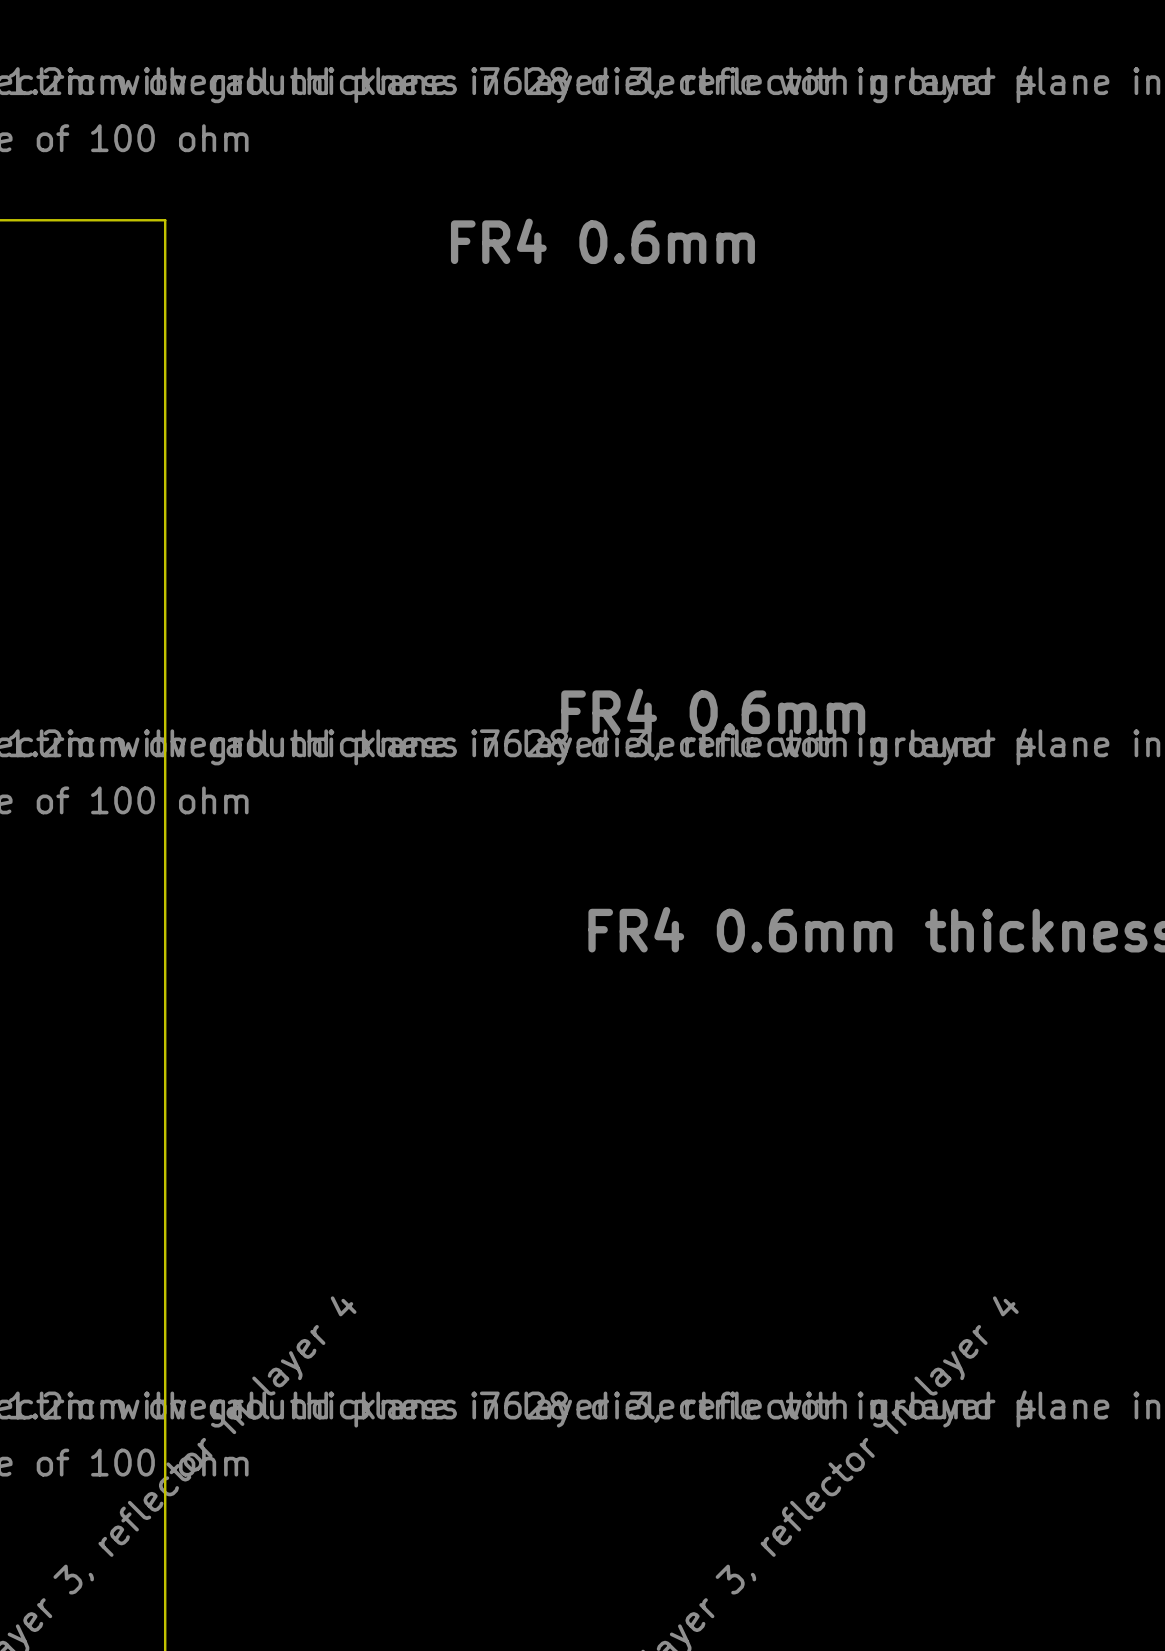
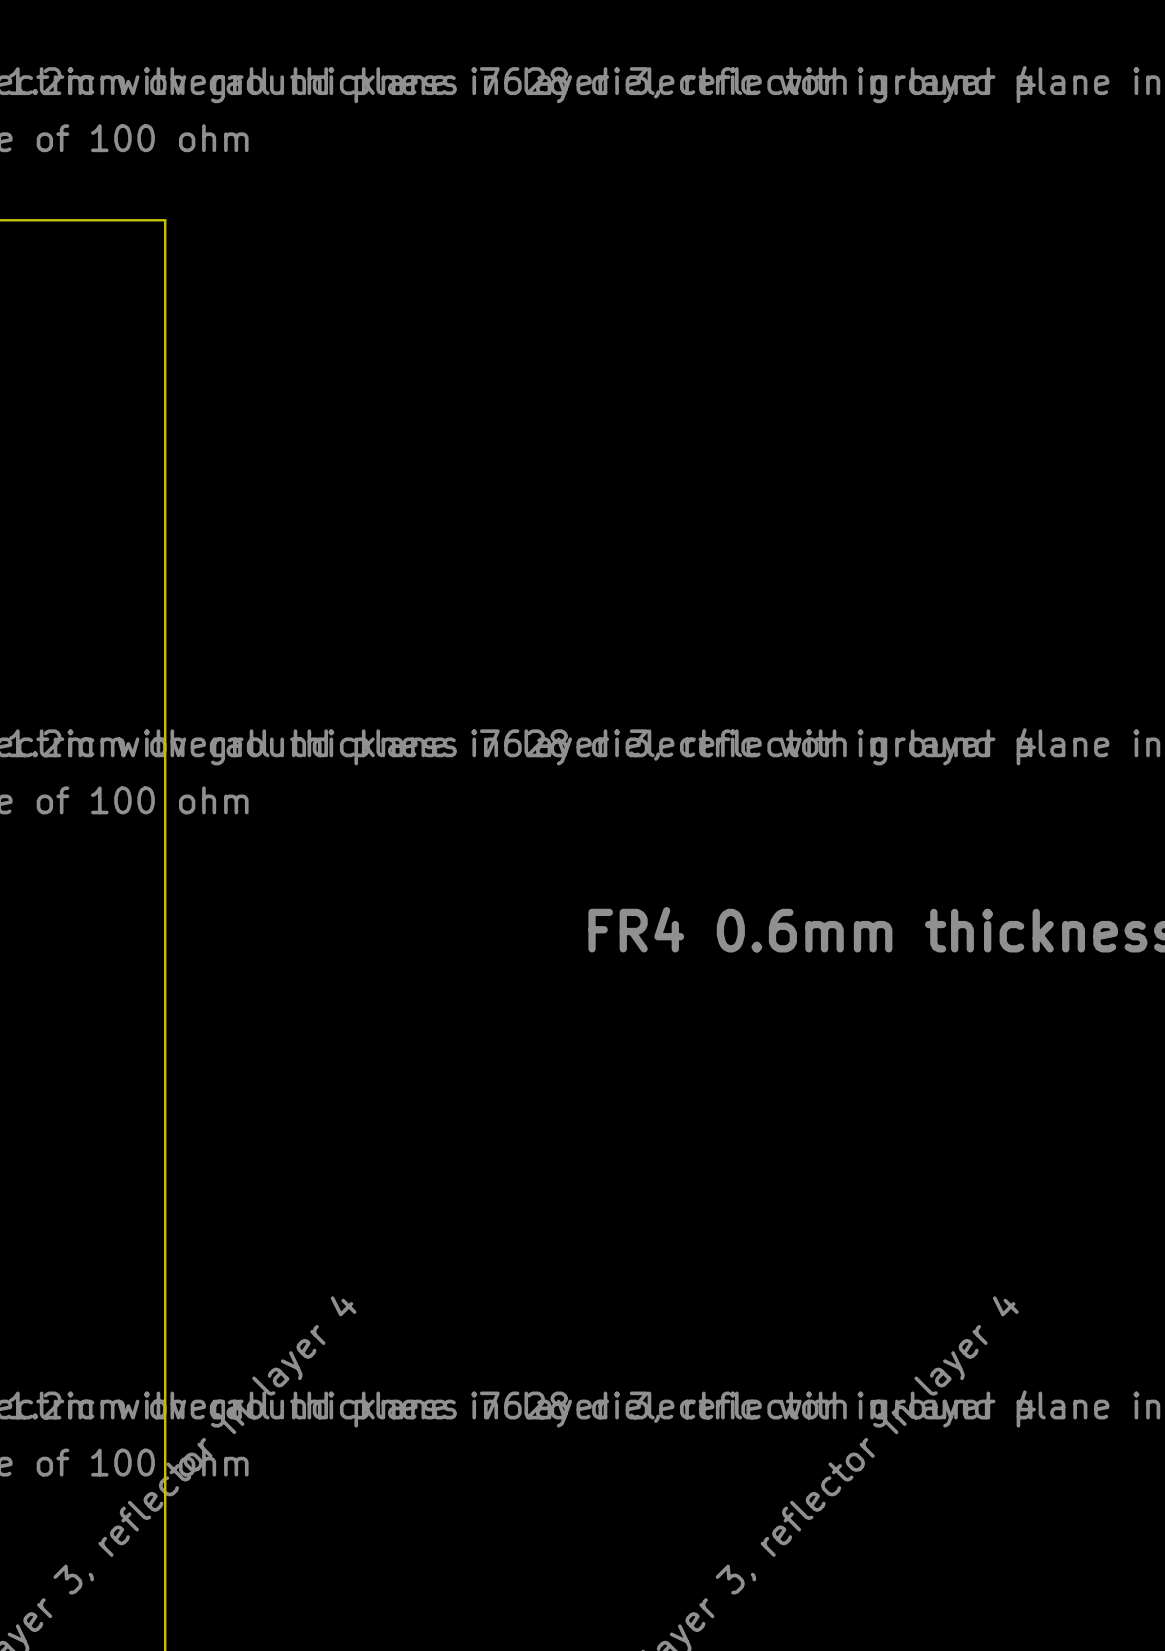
text: FR4 0.6mm (602, 241) -> none
text: FR4 0.6mm (713, 711) -> none

